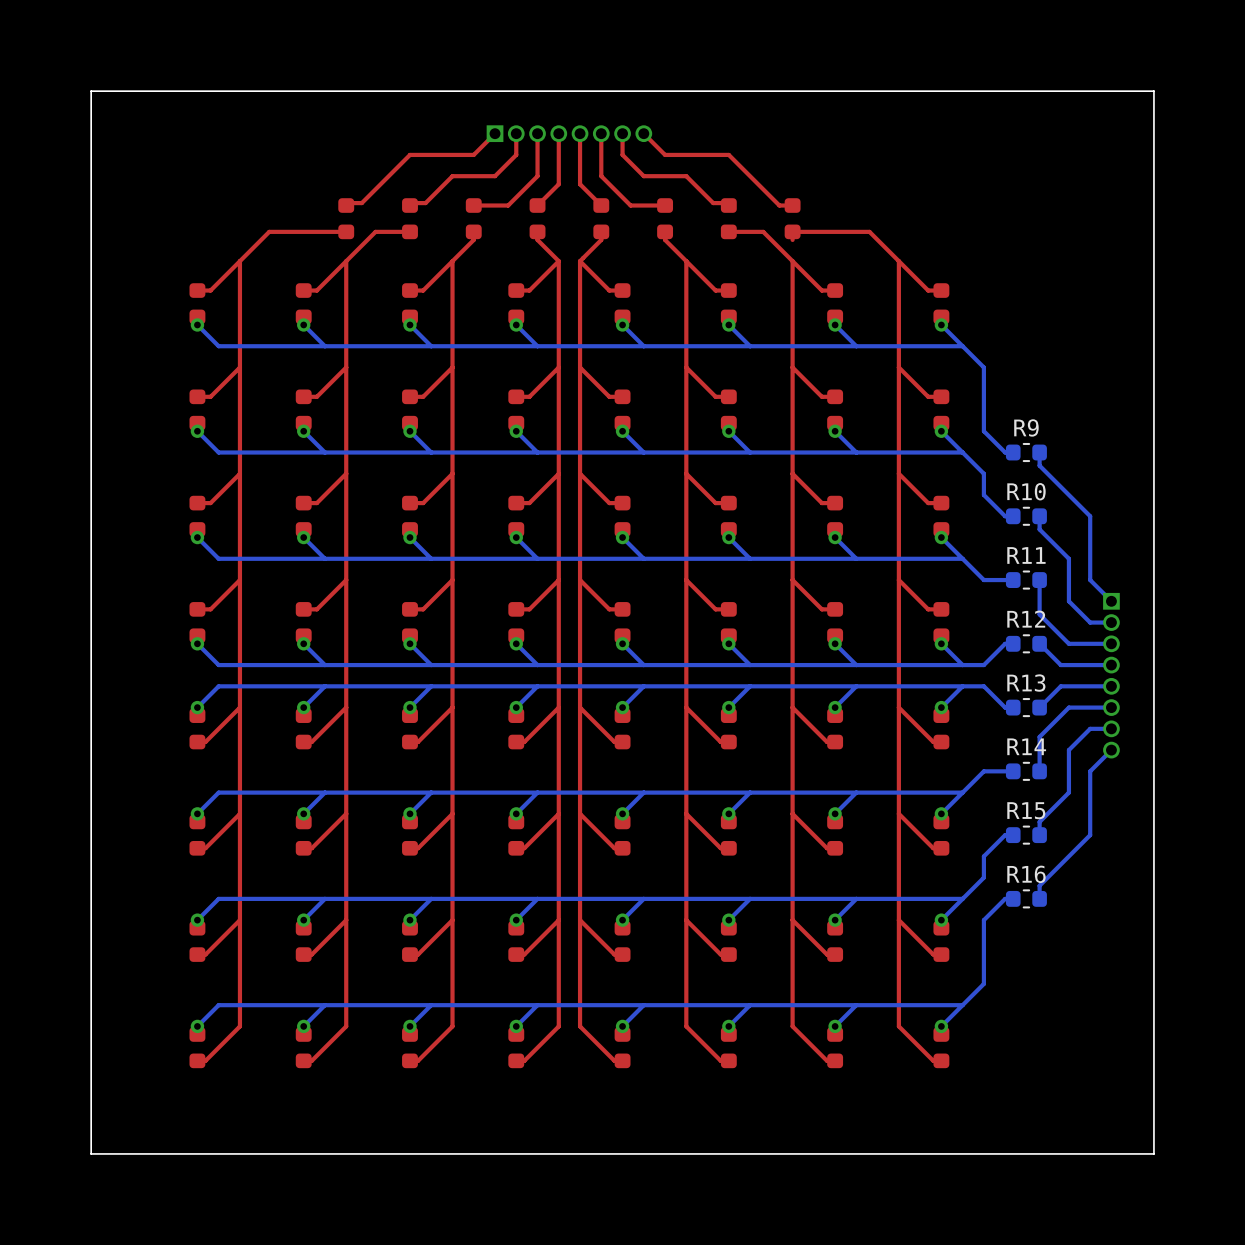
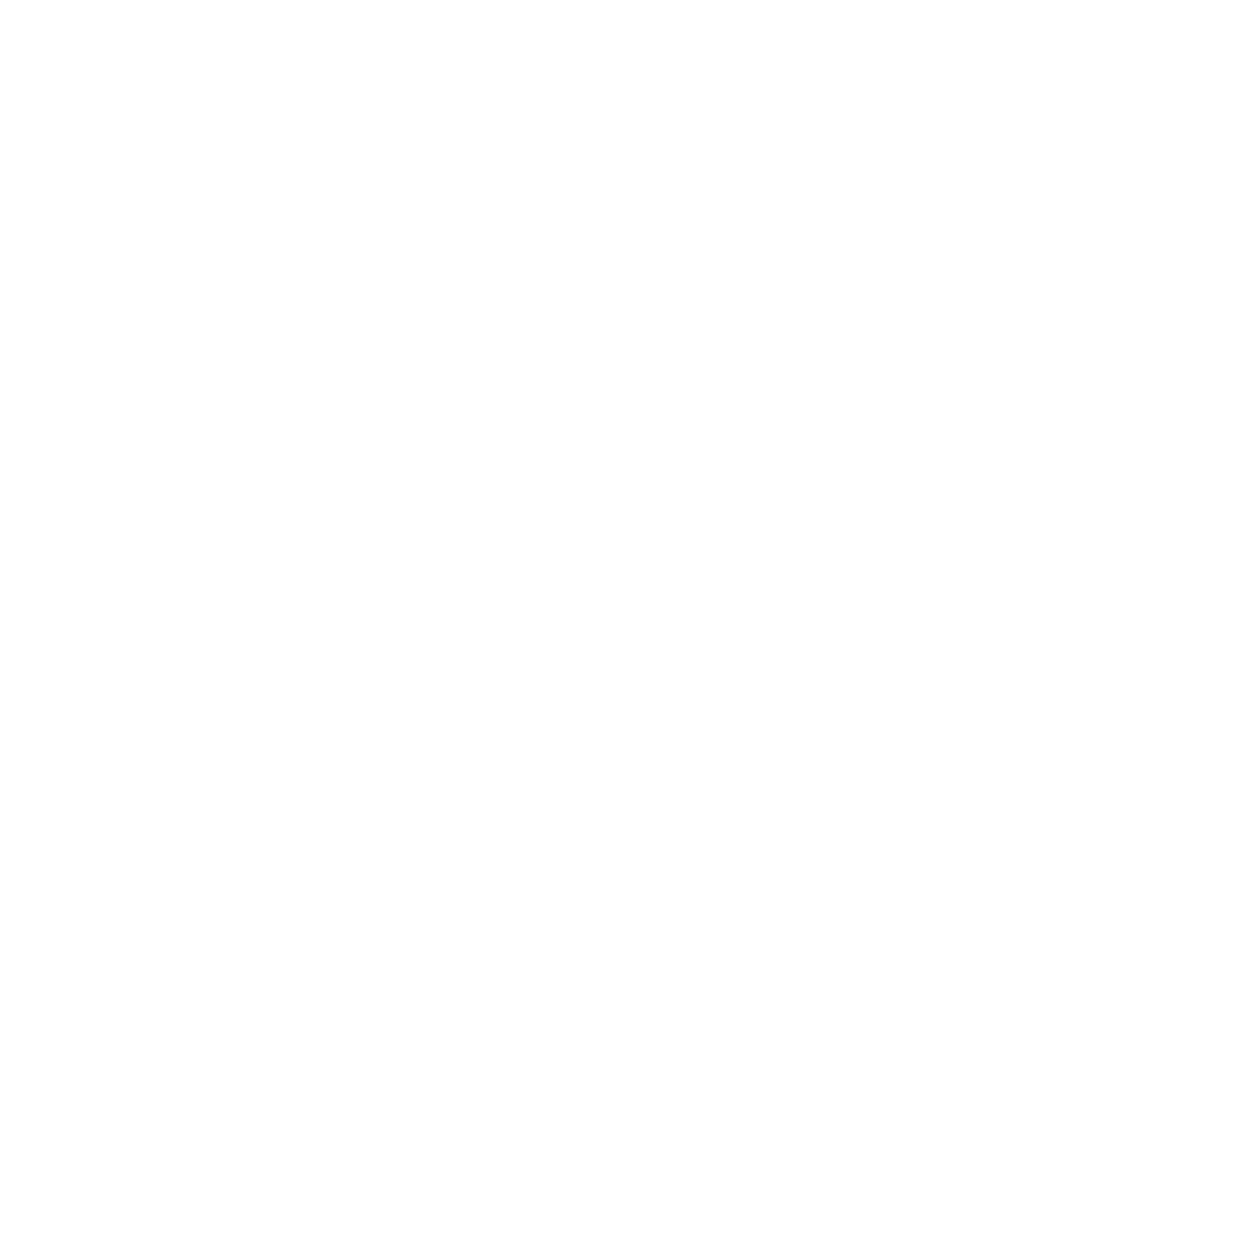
board edge: (1153, 91) (91, 91) (91, 1153) (1153, 1153) (1153, 91) -> none
top track: (495, 133) (473, 154) (410, 154) (361, 203) (346, 203) -> none
top track: (516, 133) (516, 154) (495, 176) (452, 176) (425, 203) (410, 203) -> none
top track: (537, 133) (537, 176) (508, 205) (473, 205) -> none
top track: (558, 133) (558, 184) (537, 205) -> none
part: (569, 133) -> none
top track: (580, 133) (580, 184) (601, 205) -> none
top track: (601, 133) (601, 176) (630, 205) (665, 205) -> none
top track: (622, 133) (622, 154) (643, 176) (686, 176) (713, 203) (728, 203) -> none
top track: (643, 133) (665, 154) (728, 154) (779, 205) (792, 205) -> none
part: (346, 218) -> none
part: (410, 218) -> none
part: (473, 218) -> none
part: (537, 218) -> none
part: (601, 218) -> none
part: (665, 218) -> none
part: (728, 218) -> none
part: (792, 218) -> none
top track: (346, 231) (269, 231) (210, 290) (197, 290) -> none
top track: (410, 231) (375, 231) (316, 290) (303, 290) -> none
top track: (473, 231) (473, 239) (423, 290) (410, 290) -> none
top track: (537, 231) (537, 239) (558, 261) -> none
top track: (601, 231) (601, 239) (580, 261) -> none
top track: (665, 231) (665, 239) (715, 290) (728, 290) -> none
top track: (728, 231) (763, 231) (821, 290) (835, 290) -> none
top track: (792, 239) (792, 231) (869, 231) (928, 290) (941, 290) -> none
top track: (239, 261) (239, 1026) (205, 1060) (197, 1060) -> none
top track: (346, 261) (346, 1026) (311, 1060) (303, 1060) -> none
top track: (452, 261) (452, 1026) (418, 1060) (410, 1060) -> none
top track: (558, 261) (529, 290) (516, 290) -> none
top track: (558, 261) (558, 1026) (524, 1060) (516, 1060) -> none
top track: (580, 261) (609, 290) (622, 290) -> none
top track: (580, 261) (580, 1026) (614, 1060) (622, 1060) -> none
top track: (686, 261) (686, 1026) (720, 1060) (728, 1060) -> none
top track: (792, 261) (792, 1026) (827, 1060) (835, 1060) -> none
top track: (898, 261) (898, 1026) (933, 1060) (941, 1060) -> none
part: (197, 303) -> none
part: (303, 303) -> none
part: (410, 303) -> none
part: (516, 303) -> none
part: (622, 303) -> none
part: (728, 303) -> none
part: (835, 303) -> none
part: (941, 303) -> none
bottom track: (197, 324) (218, 346) (962, 346) -> none
via: (197, 324) -> none
bottom track: (303, 324) (324, 346) -> none
via: (303, 324) -> none
bottom track: (410, 324) (431, 346) -> none
via: (410, 324) -> none
bottom track: (516, 324) (537, 346) -> none
via: (516, 324) -> none
bottom track: (622, 324) (643, 346) -> none
via: (622, 324) -> none
bottom track: (728, 324) (750, 346) -> none
via: (728, 324) -> none
bottom track: (835, 324) (856, 346) -> none
via: (835, 324) -> none
bottom track: (941, 324) (983, 367) (983, 431) (1005, 452) (1013, 452) -> none
via: (941, 324) -> none
top track: (239, 367) (210, 396) (197, 396) -> none
top track: (346, 367) (316, 396) (303, 396) -> none
top track: (452, 367) (423, 396) (410, 396) -> none
top track: (558, 367) (529, 396) (516, 396) -> none
top track: (580, 367) (609, 396) (622, 396) -> none
top track: (686, 367) (715, 396) (728, 396) -> none
top track: (792, 367) (821, 396) (835, 396) -> none
top track: (898, 367) (928, 396) (941, 396) -> none
part: (197, 410) -> none
part: (303, 410) -> none
part: (410, 410) -> none
part: (516, 410) -> none
part: (622, 410) -> none
part: (728, 410) -> none
part: (835, 410) -> none
part: (941, 410) -> none
bottom track: (197, 431) (218, 452) (962, 452) -> none
via: (197, 431) -> none
bottom track: (303, 431) (324, 452) -> none
via: (303, 431) -> none
bottom track: (410, 431) (431, 452) -> none
via: (410, 431) -> none
bottom track: (516, 431) (537, 452) -> none
via: (516, 431) -> none
bottom track: (622, 431) (643, 452) -> none
via: (622, 431) -> none
bottom track: (728, 431) (750, 452) -> none
via: (728, 431) -> none
bottom track: (835, 431) (856, 452) -> none
via: (835, 431) -> none
bottom track: (941, 431) (983, 473) (983, 495) (1005, 516) (1013, 516) -> none
via: (941, 431) -> none
R9: (1026, 452) -> none
bottom track: (1039, 452) (1039, 465) (1090, 516) (1090, 580) (1111, 601) -> none
top track: (239, 473) (210, 503) (197, 503) -> none
top track: (346, 473) (316, 503) (303, 503) -> none
top track: (452, 473) (423, 503) (410, 503) -> none
top track: (558, 473) (529, 503) (516, 503) -> none
top track: (580, 473) (609, 503) (622, 503) -> none
top track: (686, 473) (715, 503) (728, 503) -> none
top track: (792, 473) (821, 503) (835, 503) -> none
top track: (898, 473) (928, 503) (941, 503) -> none
part: (197, 516) -> none
part: (303, 516) -> none
part: (410, 516) -> none
part: (516, 516) -> none
part: (622, 516) -> none
part: (728, 516) -> none
part: (835, 516) -> none
part: (941, 516) -> none
R10: (1026, 516) -> none
bottom track: (1039, 516) (1039, 529) (1068, 558) (1068, 601) (1090, 622) (1111, 622) -> none
bottom track: (197, 537) (218, 558) (962, 558) -> none
via: (197, 537) -> none
bottom track: (303, 537) (324, 558) -> none
via: (303, 537) -> none
bottom track: (410, 537) (431, 558) -> none
via: (410, 537) -> none
bottom track: (516, 537) (537, 558) -> none
via: (516, 537) -> none
bottom track: (622, 537) (643, 558) -> none
via: (622, 537) -> none
bottom track: (728, 537) (750, 558) -> none
via: (728, 537) -> none
bottom track: (835, 537) (856, 558) -> none
via: (835, 537) -> none
bottom track: (941, 537) (983, 580) (1013, 580) -> none
via: (941, 537) -> none
top track: (239, 580) (210, 609) (197, 609) -> none
top track: (346, 580) (316, 609) (303, 609) -> none
top track: (452, 580) (423, 609) (410, 609) -> none
top track: (558, 580) (529, 609) (516, 609) -> none
top track: (580, 580) (609, 609) (622, 609) -> none
top track: (686, 580) (715, 609) (728, 609) -> none
top track: (792, 580) (821, 609) (835, 609) -> none
top track: (898, 580) (928, 609) (941, 609) -> none
R11: (1026, 580) -> none
bottom track: (1039, 580) (1039, 614) (1068, 643) (1111, 643) -> none
part: (197, 622) -> none
part: (303, 622) -> none
part: (410, 622) -> none
part: (516, 622) -> none
part: (622, 622) -> none
part: (728, 622) -> none
part: (835, 622) -> none
part: (941, 622) -> none
via: (197, 643) -> none
bottom track: (303, 643) (324, 665) -> none
via: (303, 643) -> none
bottom track: (410, 643) (431, 665) -> none
via: (410, 643) -> none
bottom track: (516, 643) (537, 665) -> none
via: (516, 643) -> none
bottom track: (622, 643) (643, 665) -> none
via: (622, 643) -> none
bottom track: (728, 643) (750, 665) -> none
via: (728, 643) -> none
bottom track: (835, 643) (856, 665) -> none
via: (835, 643) -> none
bottom track: (941, 643) (962, 665) -> none
via: (941, 643) -> none
bottom track: (1013, 643) (1005, 643) (983, 665) (218, 665) (197, 643) -> none
R12: (1026, 643) -> none
bottom track: (1039, 643) (1060, 665) (1111, 665) -> none
part: (1111, 675) -> none
bottom track: (324, 686) (303, 707) -> none
bottom track: (431, 686) (410, 707) -> none
bottom track: (537, 686) (516, 707) -> none
bottom track: (643, 686) (622, 707) -> none
bottom track: (750, 686) (728, 707) -> none
bottom track: (856, 686) (835, 707) -> none
bottom track: (962, 686) (941, 707) -> none
bottom track: (1111, 686) (1060, 686) (1039, 707) -> none
via: (197, 707) -> none
top track: (239, 707) (205, 742) (197, 742) -> none
via: (303, 707) -> none
top track: (346, 707) (311, 742) (303, 742) -> none
via: (410, 707) -> none
top track: (452, 707) (418, 742) (410, 742) -> none
via: (516, 707) -> none
top track: (558, 707) (524, 742) (516, 742) -> none
top track: (580, 707) (614, 742) (622, 742) -> none
via: (622, 707) -> none
top track: (686, 707) (720, 742) (728, 742) -> none
via: (728, 707) -> none
top track: (792, 707) (827, 742) (835, 742) -> none
via: (835, 707) -> none
top track: (898, 707) (933, 742) (941, 742) -> none
via: (941, 707) -> none
bottom track: (1013, 707) (1005, 707) (983, 686) (218, 686) (197, 707) -> none
R13: (1026, 707) -> none
bottom track: (1111, 707) (1068, 707) (1039, 736) (1039, 771) -> none
part: (197, 728) -> none
part: (303, 728) -> none
part: (410, 728) -> none
part: (516, 728) -> none
part: (622, 728) -> none
part: (728, 728) -> none
part: (835, 728) -> none
part: (941, 728) -> none
bottom track: (1111, 728) (1090, 728) (1068, 750) (1068, 792) (1039, 821) (1039, 835) -> none
bottom track: (1111, 750) (1090, 771) (1090, 835) (1039, 885) (1039, 898) -> none
bottom track: (1013, 771) (983, 771) (941, 813) -> none
R14: (1026, 771) -> none
bottom track: (324, 792) (303, 813) -> none
bottom track: (431, 792) (410, 813) -> none
bottom track: (537, 792) (516, 813) -> none
bottom track: (643, 792) (622, 813) -> none
bottom track: (750, 792) (728, 813) -> none
bottom track: (856, 792) (835, 813) -> none
bottom track: (962, 792) (218, 792) (197, 813) -> none
via: (197, 813) -> none
top track: (239, 813) (205, 848) (197, 848) -> none
via: (303, 813) -> none
top track: (346, 813) (311, 848) (303, 848) -> none
via: (410, 813) -> none
top track: (452, 813) (418, 848) (410, 848) -> none
via: (516, 813) -> none
top track: (558, 813) (524, 848) (516, 848) -> none
top track: (580, 813) (614, 848) (622, 848) -> none
via: (622, 813) -> none
top track: (686, 813) (720, 848) (728, 848) -> none
via: (728, 813) -> none
top track: (792, 813) (827, 848) (835, 848) -> none
via: (835, 813) -> none
top track: (898, 813) (933, 848) (941, 848) -> none
via: (941, 813) -> none
part: (197, 835) -> none
part: (303, 835) -> none
part: (410, 835) -> none
part: (516, 835) -> none
part: (622, 835) -> none
part: (728, 835) -> none
part: (835, 835) -> none
part: (941, 835) -> none
bottom track: (1013, 835) (1005, 835) (983, 856) (983, 877) (941, 920) -> none
R15: (1026, 835) -> none
bottom track: (324, 898) (303, 920) -> none
bottom track: (431, 898) (410, 920) -> none
bottom track: (537, 898) (516, 920) -> none
bottom track: (643, 898) (622, 920) -> none
bottom track: (750, 898) (728, 920) -> none
bottom track: (856, 898) (835, 920) -> none
bottom track: (962, 898) (218, 898) (197, 920) -> none
bottom track: (1013, 898) (1005, 898) (983, 920) (983, 983) (941, 1026) -> none
R16: (1026, 898) -> none
via: (197, 920) -> none
top track: (239, 920) (205, 954) (197, 954) -> none
via: (303, 920) -> none
top track: (346, 920) (311, 954) (303, 954) -> none
via: (410, 920) -> none
top track: (452, 920) (418, 954) (410, 954) -> none
via: (516, 920) -> none
top track: (558, 920) (524, 954) (516, 954) -> none
top track: (580, 920) (614, 954) (622, 954) -> none
via: (622, 920) -> none
top track: (686, 920) (720, 954) (728, 954) -> none
via: (728, 920) -> none
top track: (792, 920) (827, 954) (835, 954) -> none
via: (835, 920) -> none
top track: (898, 920) (933, 954) (941, 954) -> none
via: (941, 920) -> none
part: (197, 941) -> none
part: (303, 941) -> none
part: (410, 941) -> none
part: (516, 941) -> none
part: (622, 941) -> none
part: (728, 941) -> none
part: (835, 941) -> none
part: (941, 941) -> none
bottom track: (324, 1005) (303, 1026) -> none
bottom track: (431, 1005) (410, 1026) -> none
bottom track: (537, 1005) (516, 1026) -> none
bottom track: (643, 1005) (622, 1026) -> none
bottom track: (750, 1005) (728, 1026) -> none
bottom track: (856, 1005) (835, 1026) -> none
bottom track: (962, 1005) (218, 1005) (197, 1026) -> none
via: (197, 1026) -> none
via: (303, 1026) -> none
via: (410, 1026) -> none
via: (516, 1026) -> none
via: (622, 1026) -> none
via: (728, 1026) -> none
via: (835, 1026) -> none
via: (941, 1026) -> none
part: (197, 1047) -> none
part: (303, 1047) -> none
part: (410, 1047) -> none
part: (516, 1047) -> none
part: (622, 1047) -> none
part: (728, 1047) -> none
part: (835, 1047) -> none
part: (941, 1047) -> none

